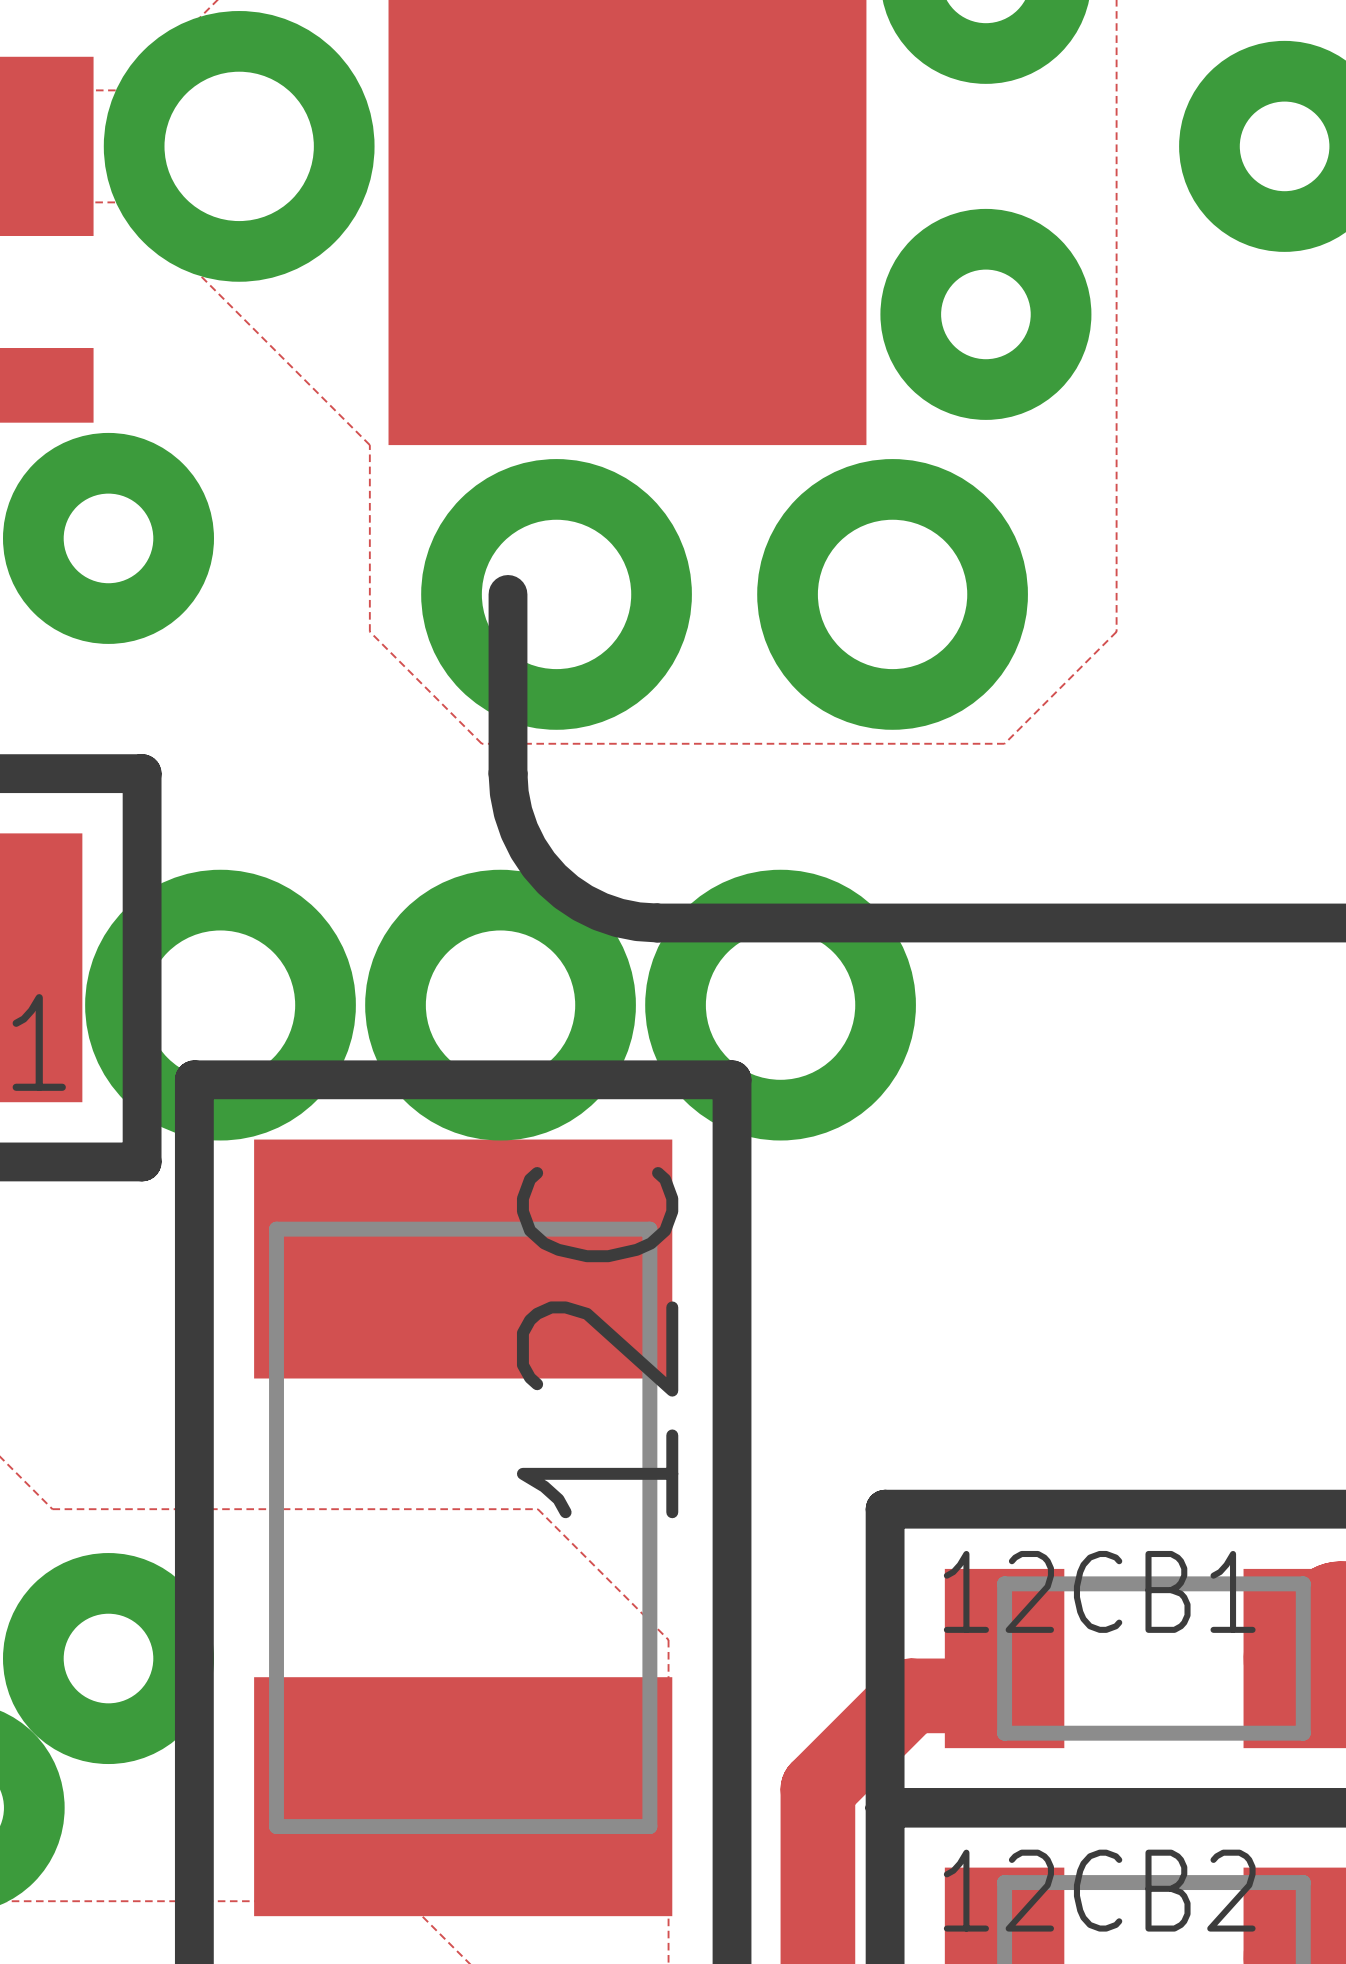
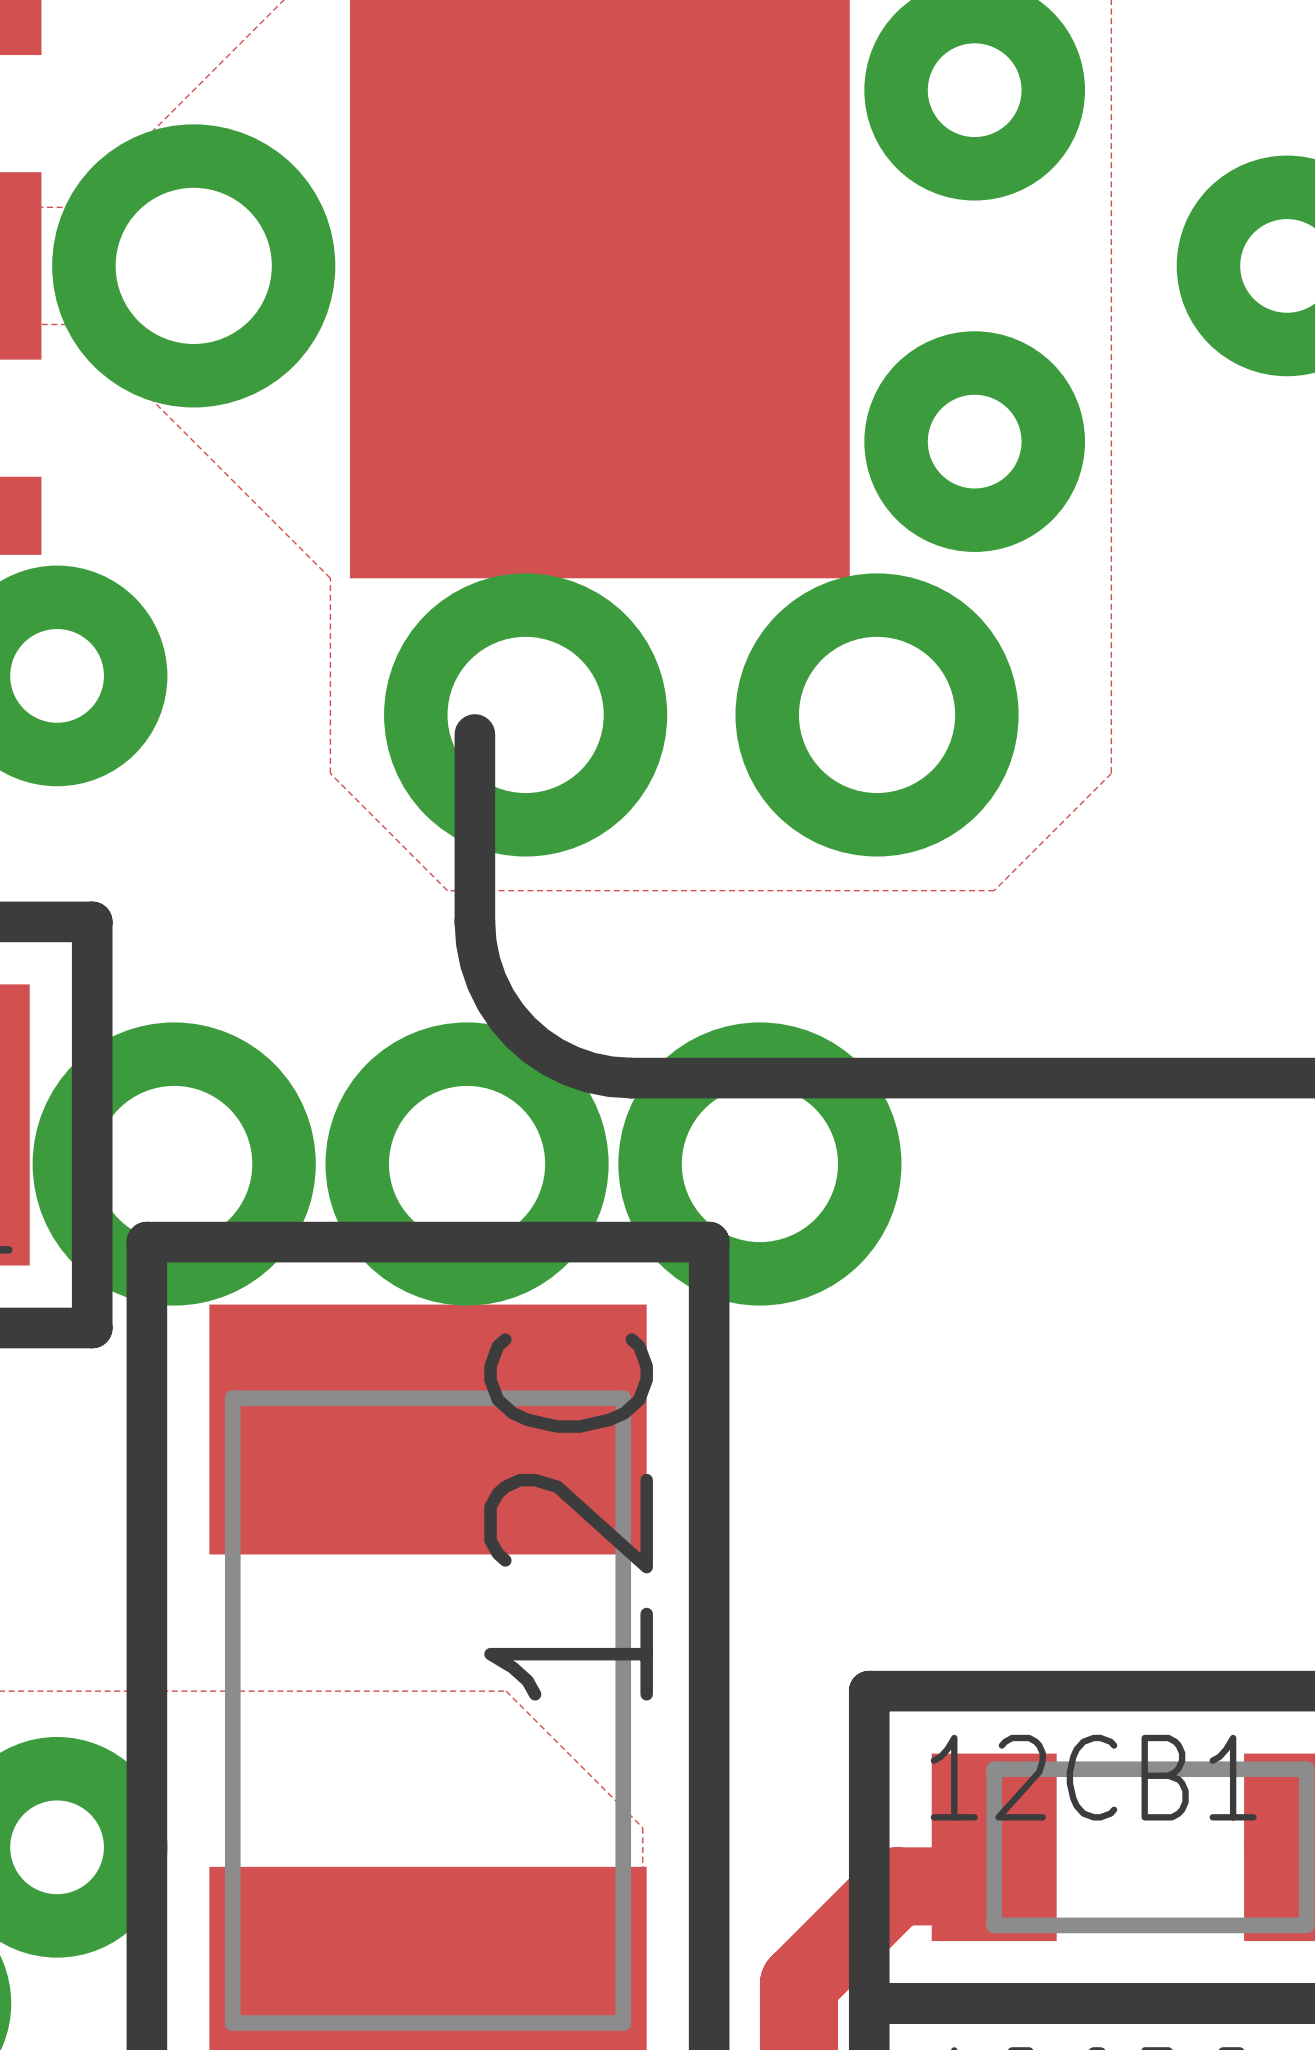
via position: (556, 594) -> (525, 714)
via position: (892, 594) -> (877, 714)

